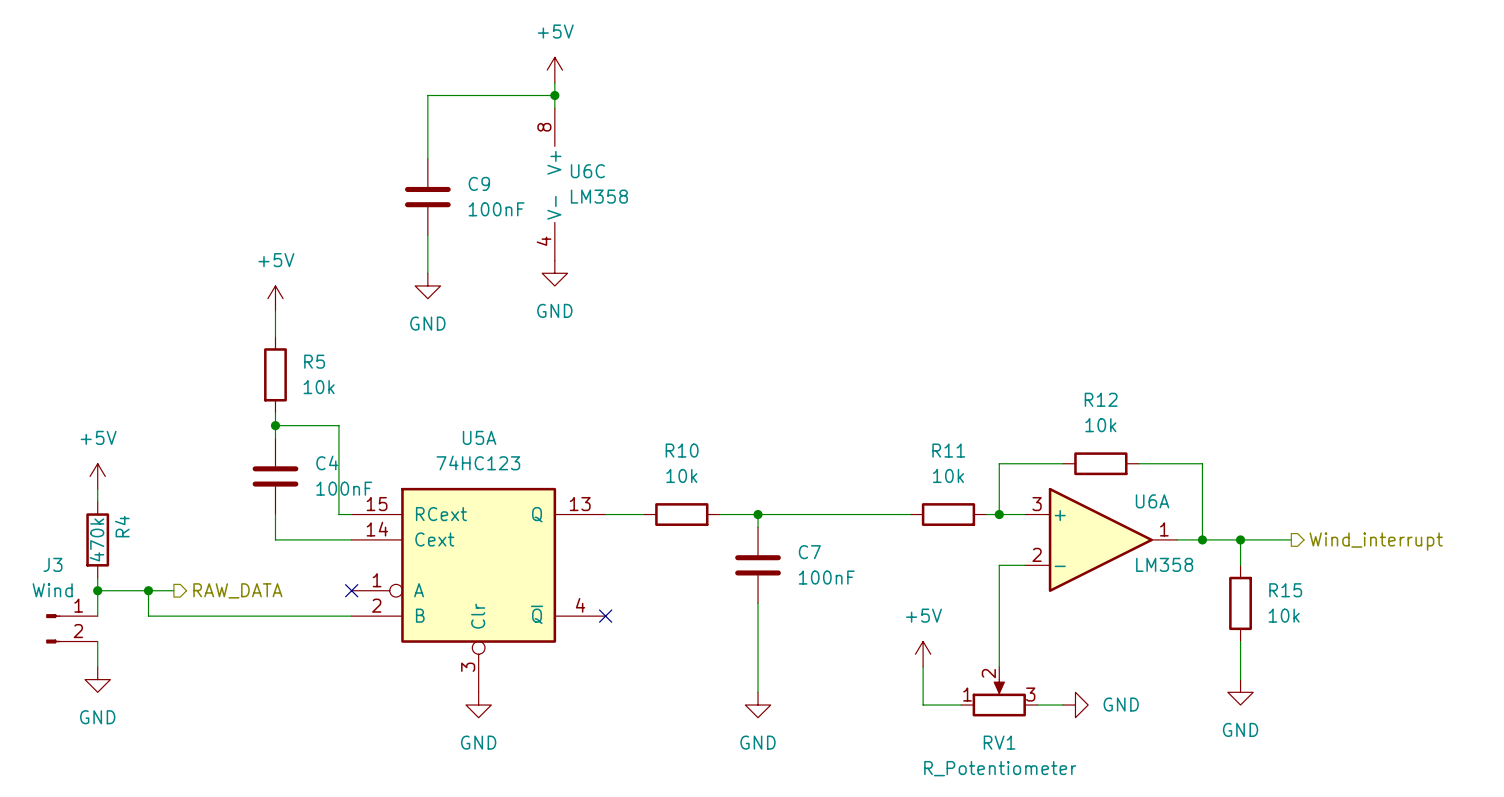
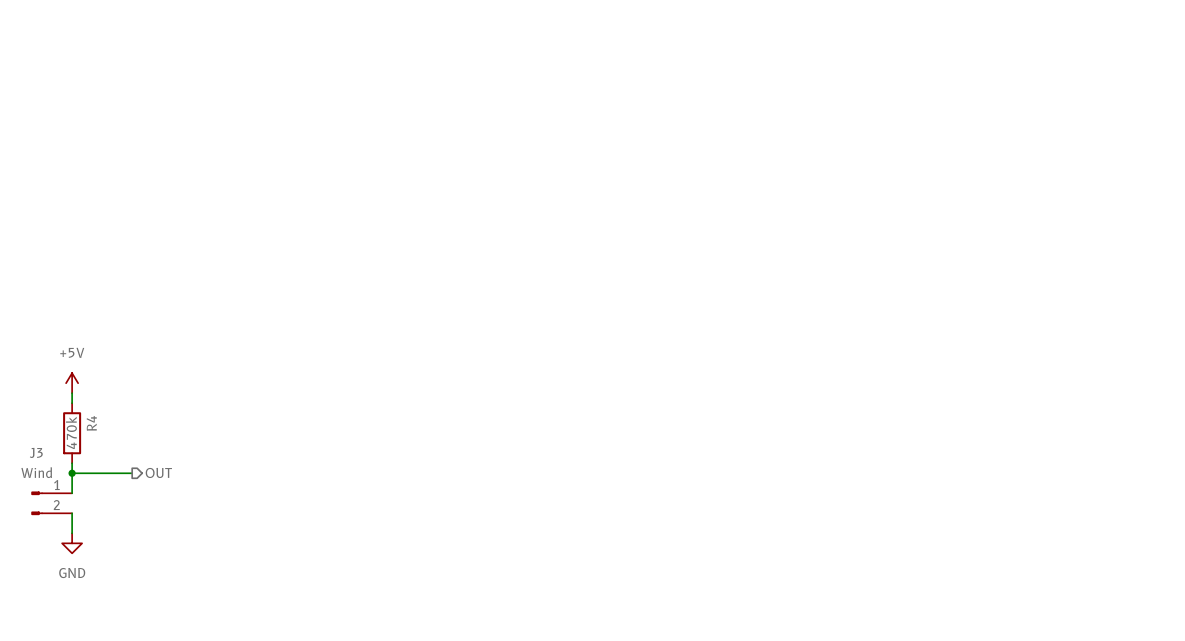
power symbol: +5V (554, 70) -> none
wire: (554, 82) (554, 108) -> none
wire: (554, 95) (427, 95) (427, 158) -> none
junction: (554, 95) -> none
U6C: LM358 (554, 184) -> none
C9: 100nF (427, 197) -> none
wire: (427, 235) (427, 273) -> none
power symbol: GND (554, 273) -> none
power symbol: GND (427, 285) -> none
power symbol: +5V (275, 298) -> none
wire: (275, 311) (275, 336) -> none
R5: 10k (275, 374) -> none
wire: (275, 412) (275, 438) -> none
wire: (275, 425) (338, 425) (338, 514) (351, 514) -> none
junction: (275, 425) -> none
wire: (1062, 463) (999, 463) (999, 514) -> none
R12: 10k (1100, 463) -> none
wire: (1138, 463) (1202, 463) (1202, 539) -> none
C4: 100nF (275, 476) -> none
wire: (275, 514) (275, 539) (351, 539) -> none
wire: (605, 514) (643, 514) -> none
R10: 10k (681, 514) -> none
wire: (719, 514) (910, 514) -> none
wire: (758, 514) (758, 527) -> none
junction: (758, 514) -> none
R11: 10k (948, 514) -> none
wire: (986, 514) (1024, 514) -> none
junction: (999, 514) -> none
U6A: LM358 (1100, 539) -> none
wire: (1177, 539) (1291, 539) -> none
junction: (1202, 539) -> none
wire: (1240, 539) (1240, 565) -> none
junction: (1240, 539) -> none
hierarchical label: Wind_interrupt (1376, 541) -> none
C7: 100nF (758, 565) -> none
wire: (1024, 565) (999, 565) (999, 666) -> none
wire: (148, 590) (148, 616) (351, 616) -> none
junction: (148, 590) -> none
hierarchical label: RAW_DATA (237, 590) -> OUT (158, 472)
no-connect mark: (351, 590) -> none
U5A: 74HC123 (478, 590) -> none
wire: (758, 603) (758, 692) -> none
R15: 10k (1240, 603) -> none
no-connect mark: (605, 616) -> none
wire: (1240, 641) (1240, 679) -> none
power symbol: +5V (923, 654) -> none
wire: (923, 666) (923, 705) (961, 705) -> none
RV1: R_Potentiometer (999, 691) -> none
power symbol: GND (1240, 692) -> none
power symbol: GND (478, 705) -> none
power symbol: GND (758, 705) -> none
wire: (1037, 705) (1062, 705) -> none
power symbol: GND (1075, 705) -> none

